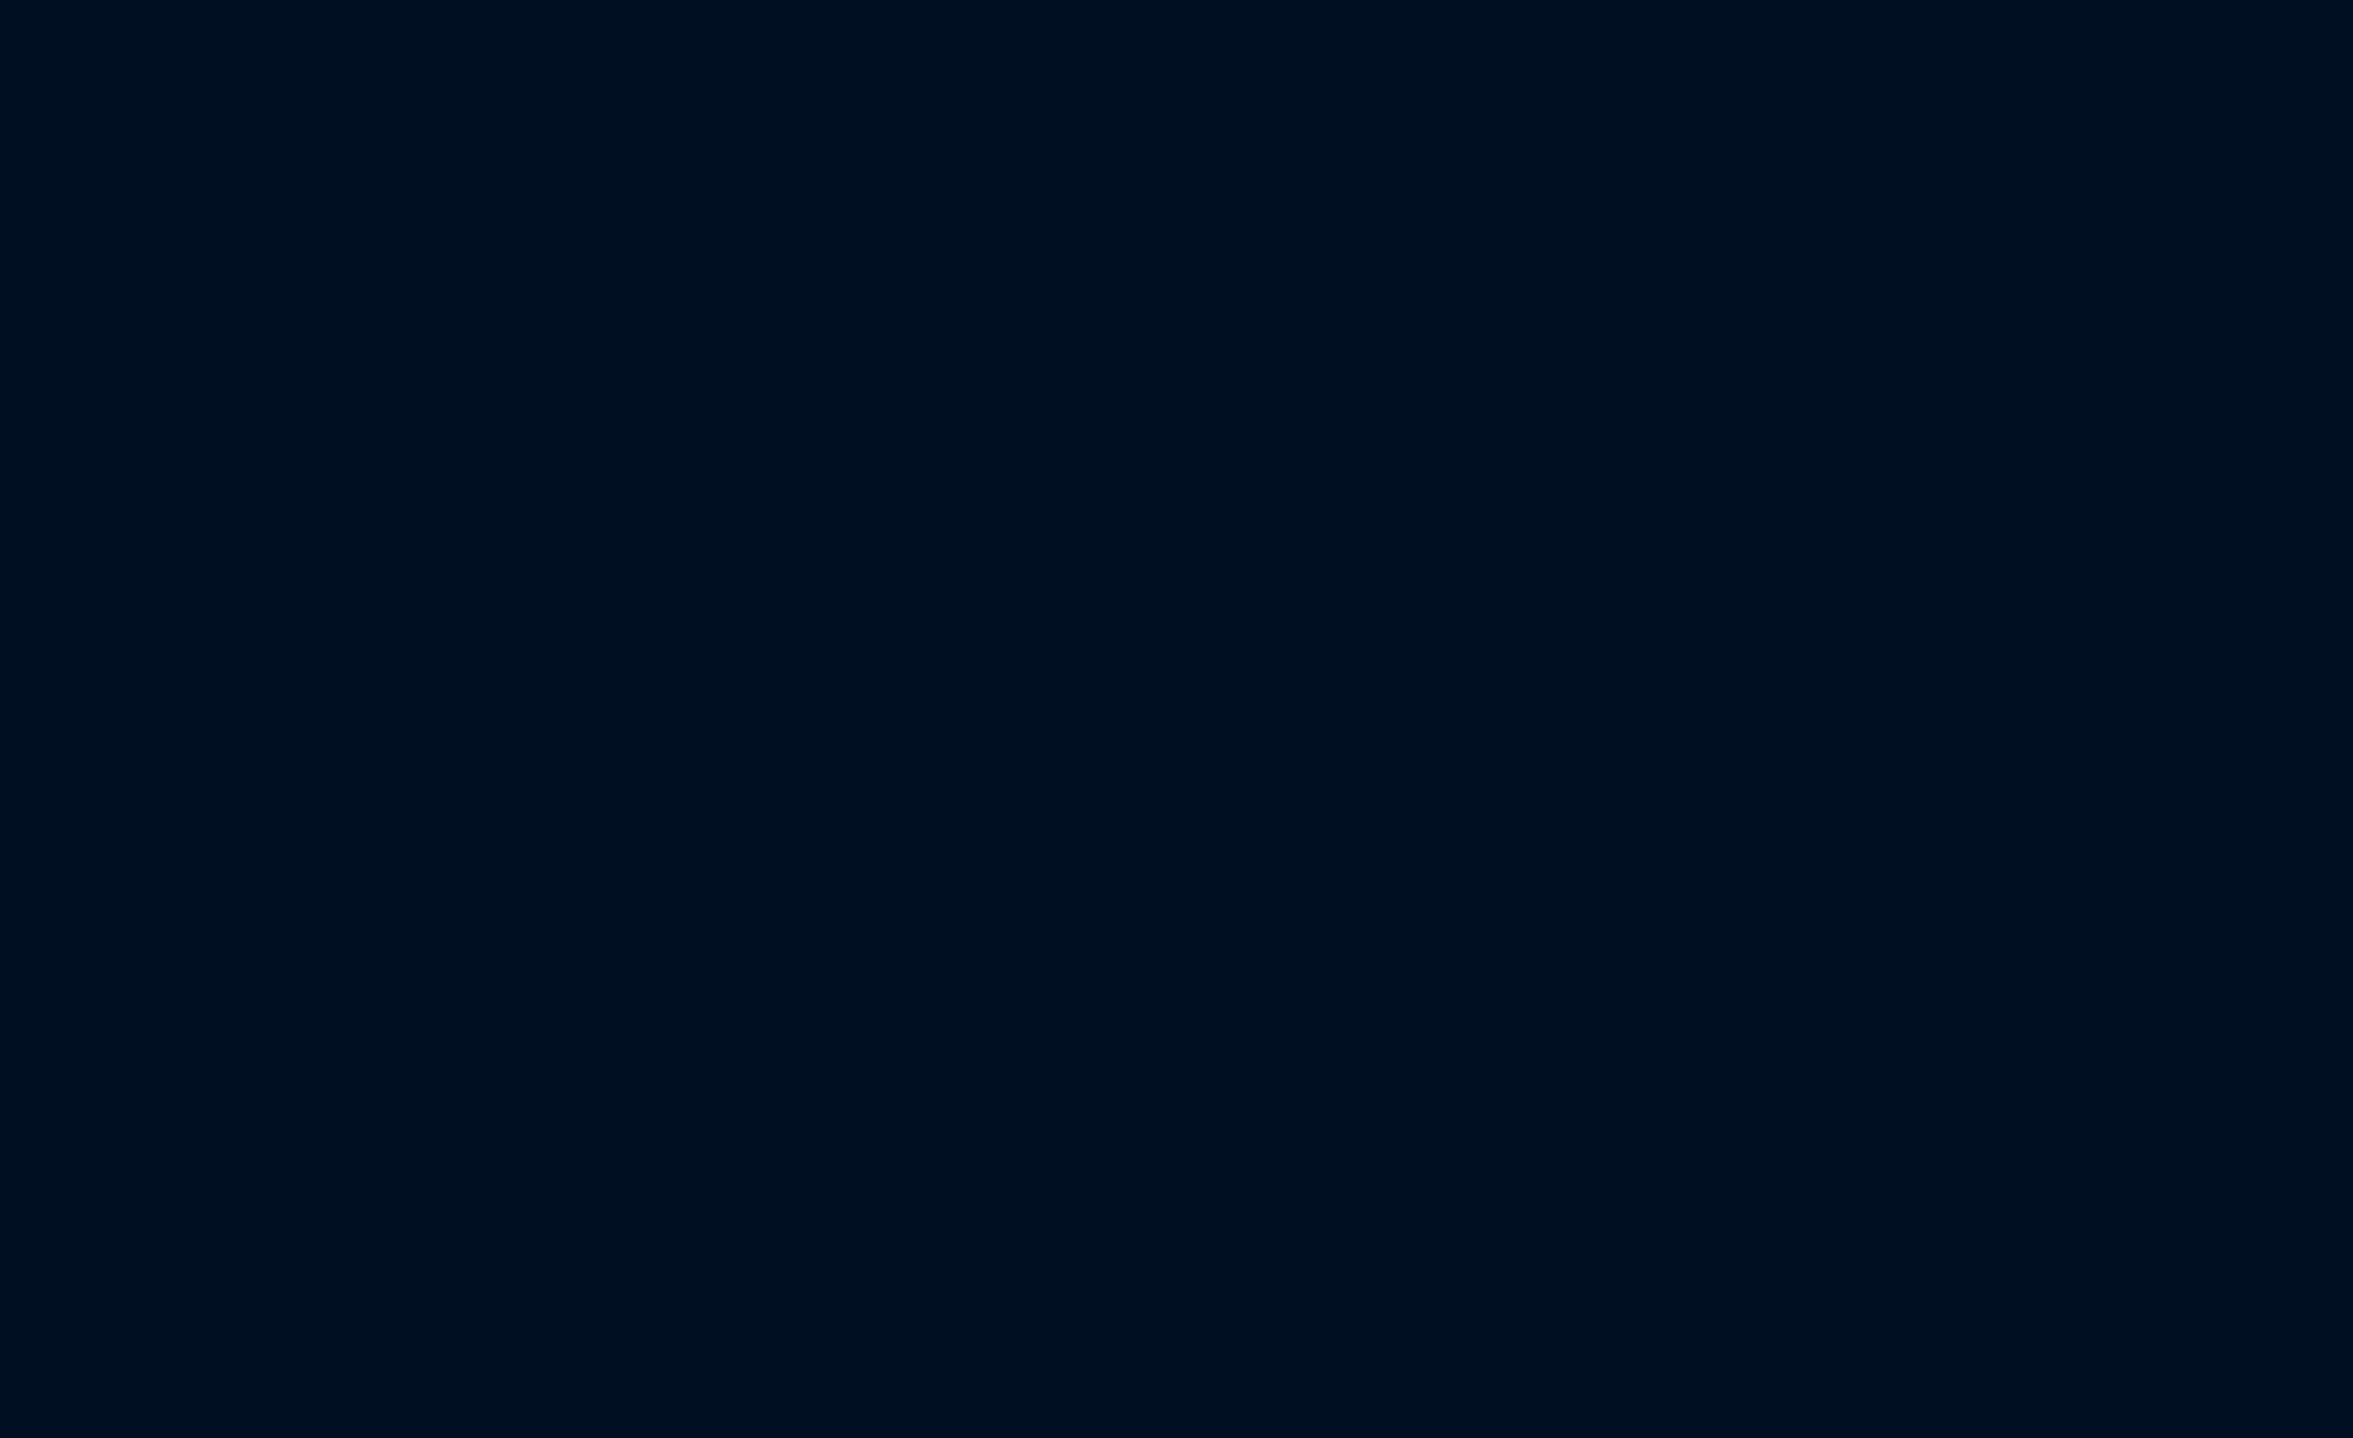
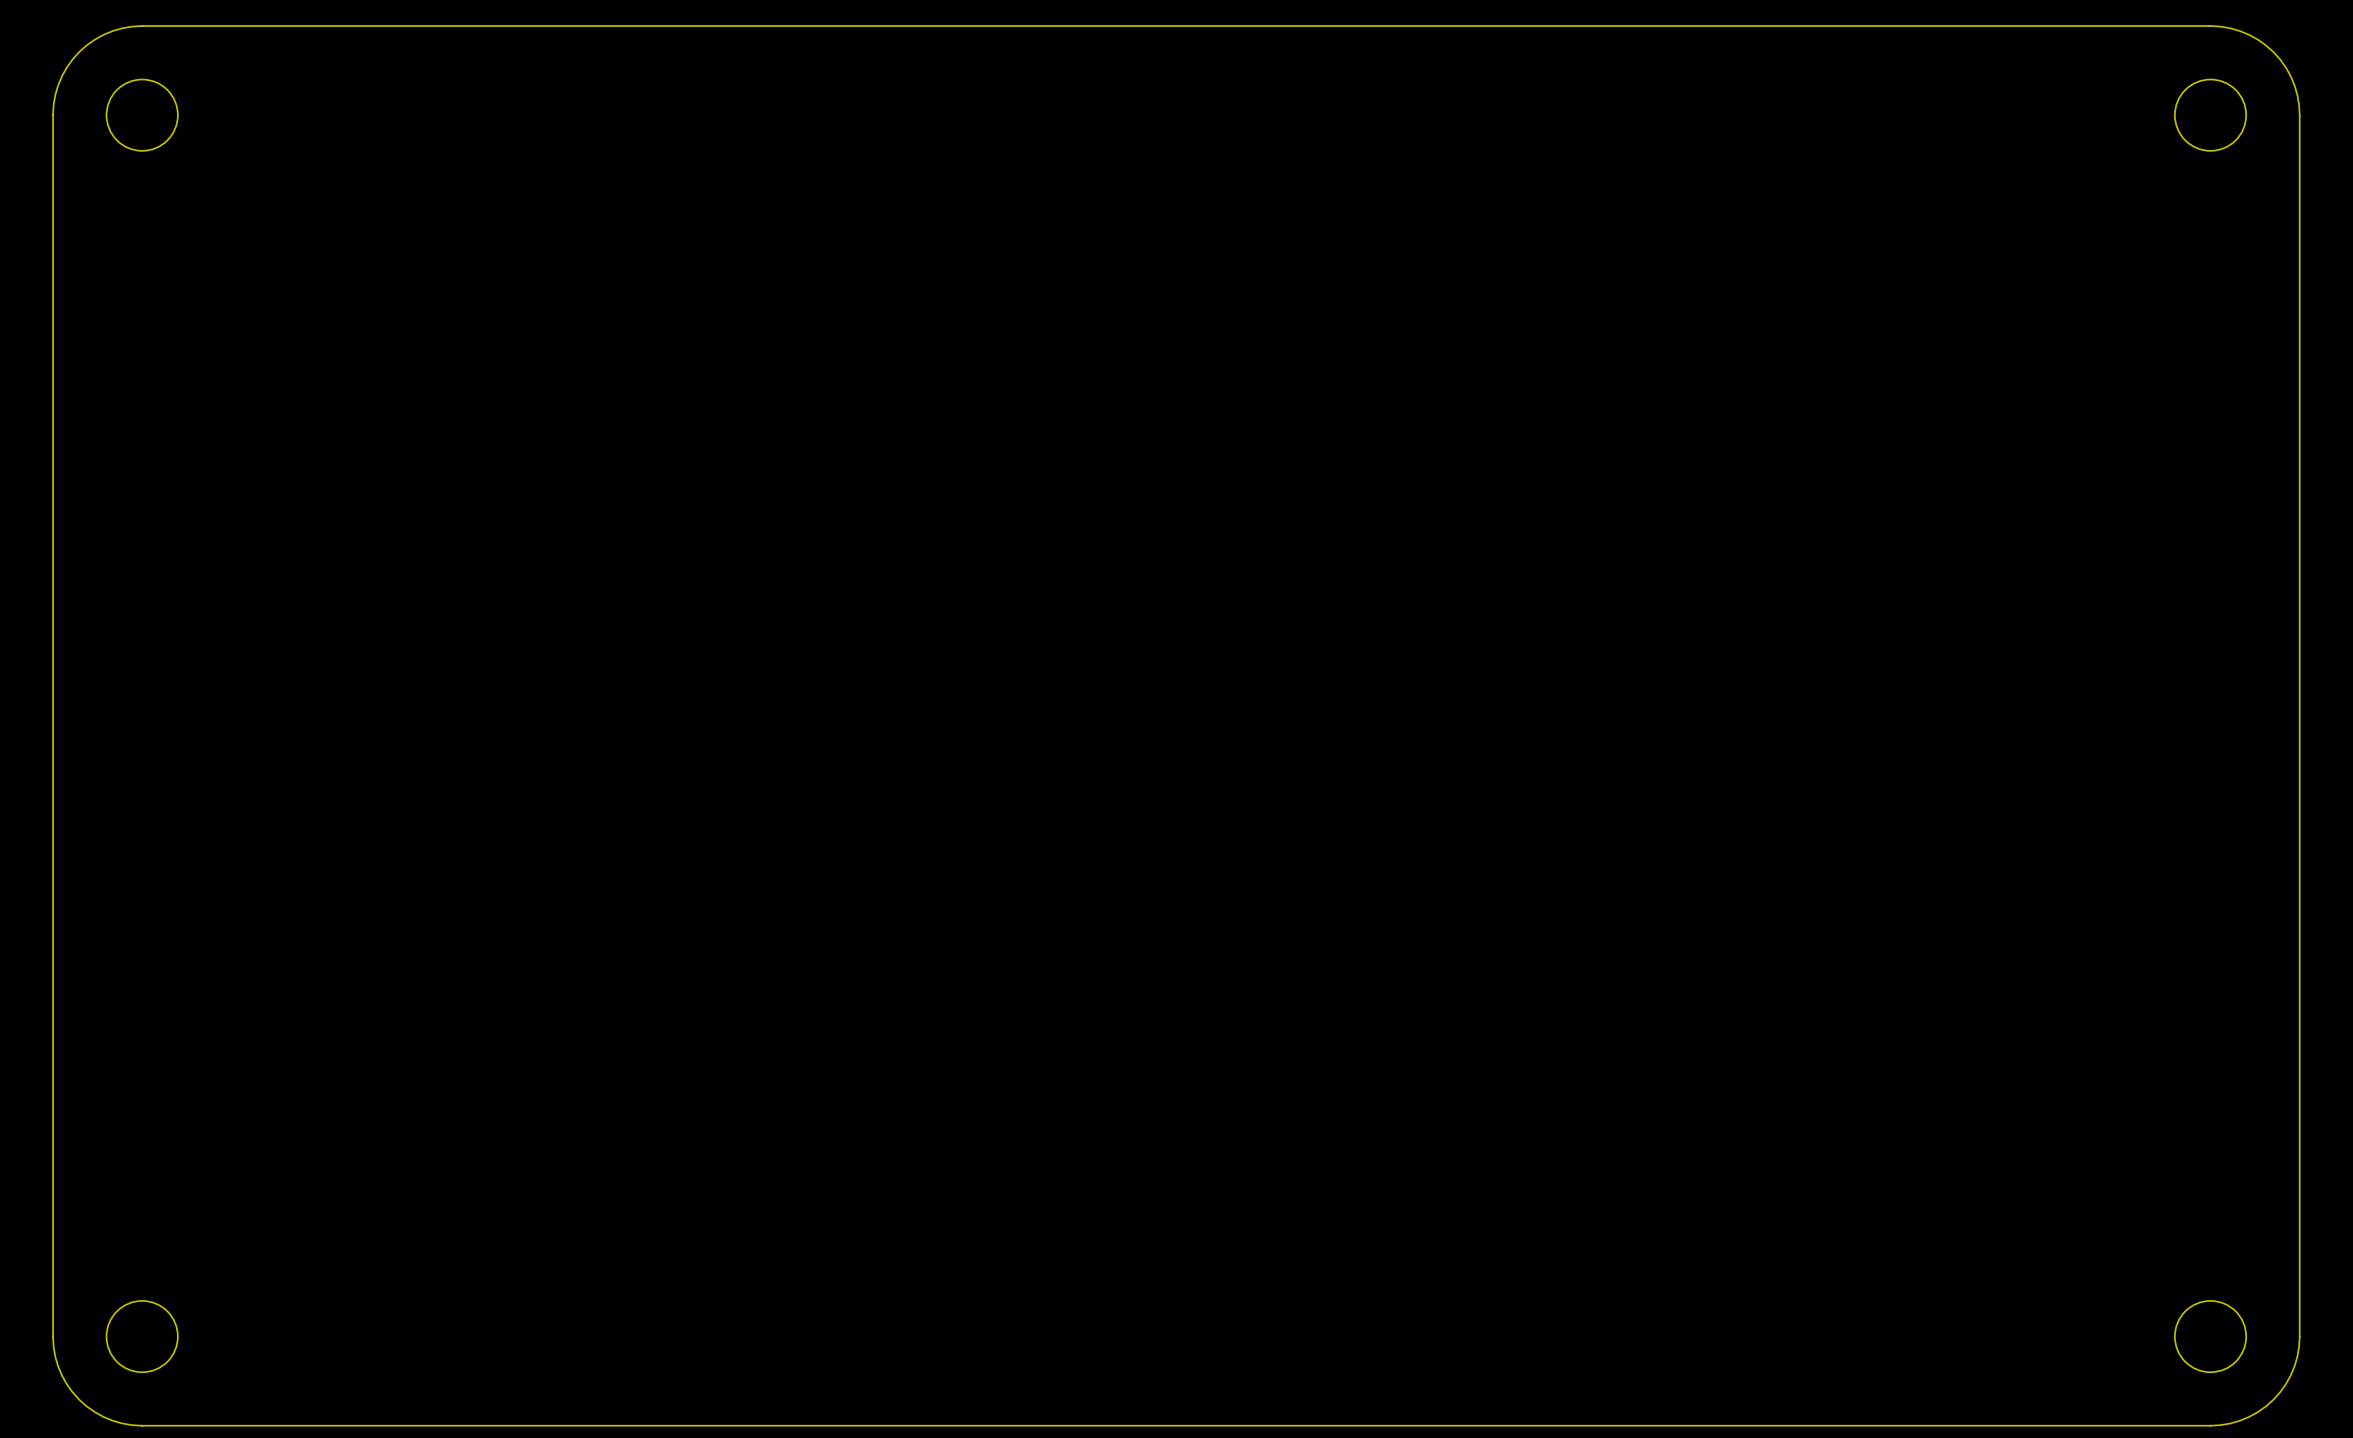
board edge: none -> (2210, 26) (142, 26) (112, 31) (94, 39) (79, 52) (66, 67) (58, 85) (53, 115) (53, 1336) (58, 1366) (66, 1384) (86, 1406) (103, 1416) (122, 1423) (142, 1425) (2210, 1425) (2230, 1423) (2257, 1412) (2280, 1392) (2290, 1375) (2297, 1356) (2299, 1336) (2299, 115) (2297, 95) (2290, 76) (2273, 52) (2249, 34) (2230, 28) (2210, 26)
round board edge: none -> [106, 79, 179, 152]
round board edge: none -> [2174, 79, 2247, 152]
round board edge: none -> [106, 1300, 179, 1373]
round board edge: none -> [2174, 1300, 2247, 1373]

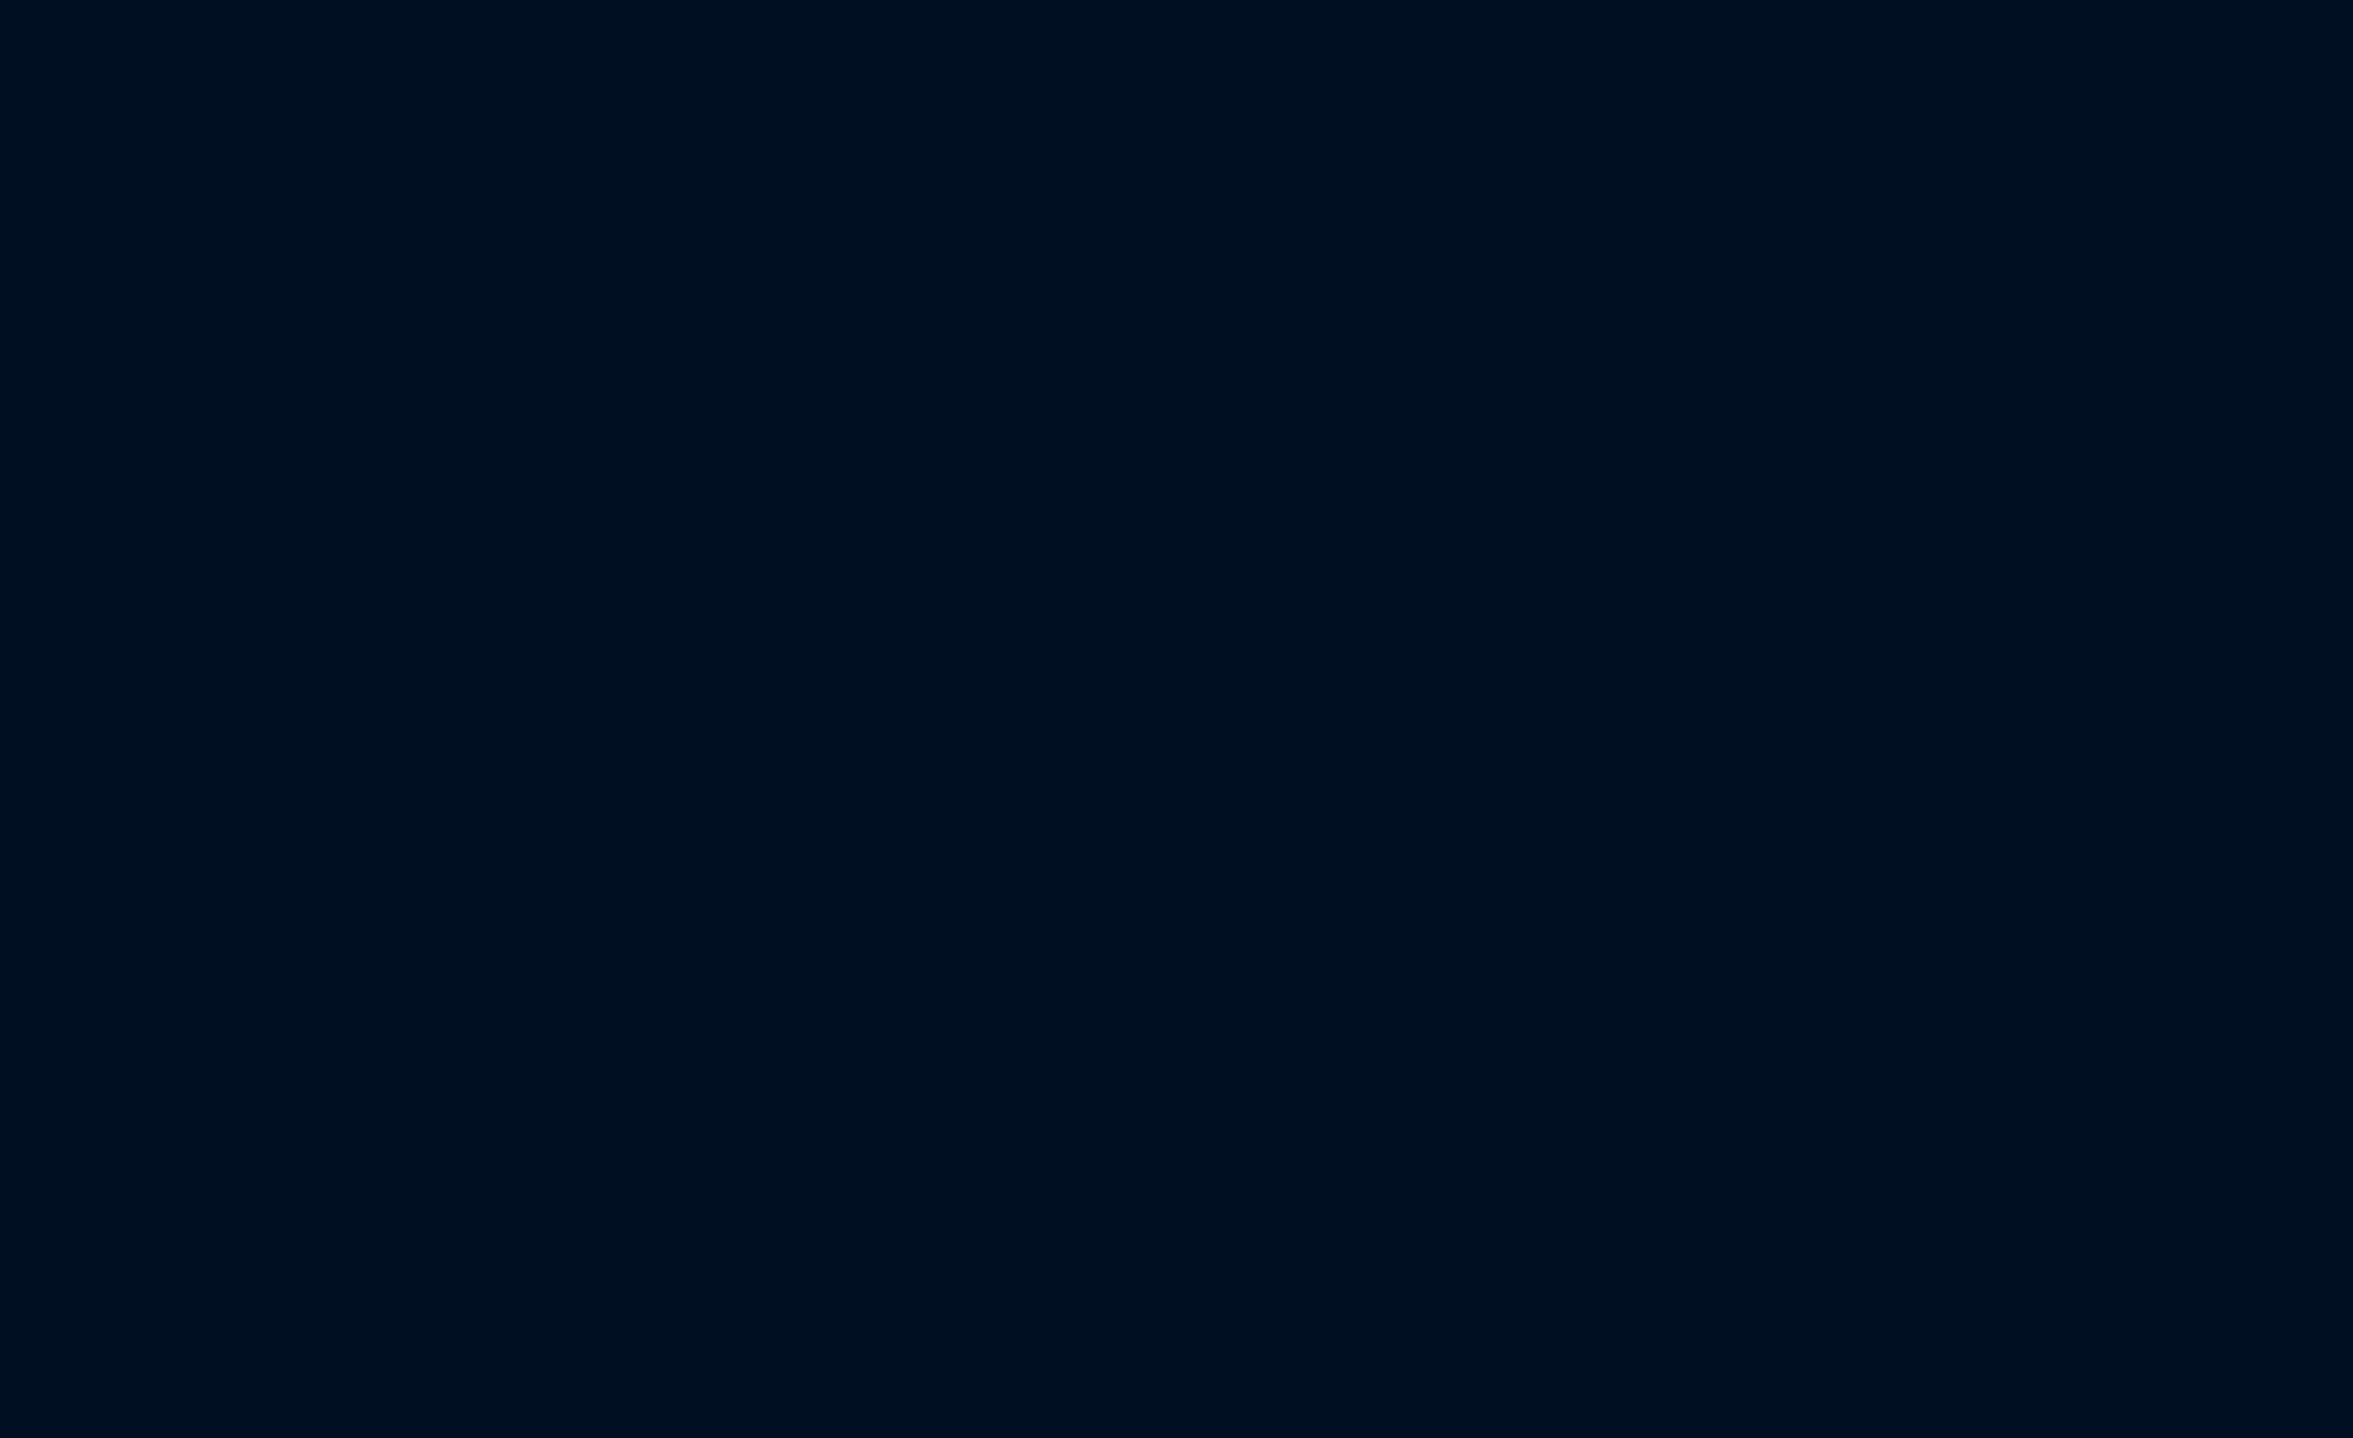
board edge: (2210, 26) (142, 26) (112, 31) (94, 39) (79, 52) (66, 67) (58, 85) (53, 115) (53, 1336) (58, 1366) (66, 1384) (86, 1406) (103, 1416) (122, 1423) (142, 1425) (2210, 1425) (2230, 1423) (2257, 1412) (2280, 1392) (2290, 1375) (2297, 1356) (2299, 1336) (2299, 115) (2297, 95) (2290, 76) (2273, 52) (2249, 34) (2230, 28) (2210, 26) -> none
round board edge: [106, 79, 179, 152] -> none
round board edge: [2174, 79, 2247, 152] -> none
round board edge: [106, 1300, 179, 1373] -> none
round board edge: [2174, 1300, 2247, 1373] -> none

